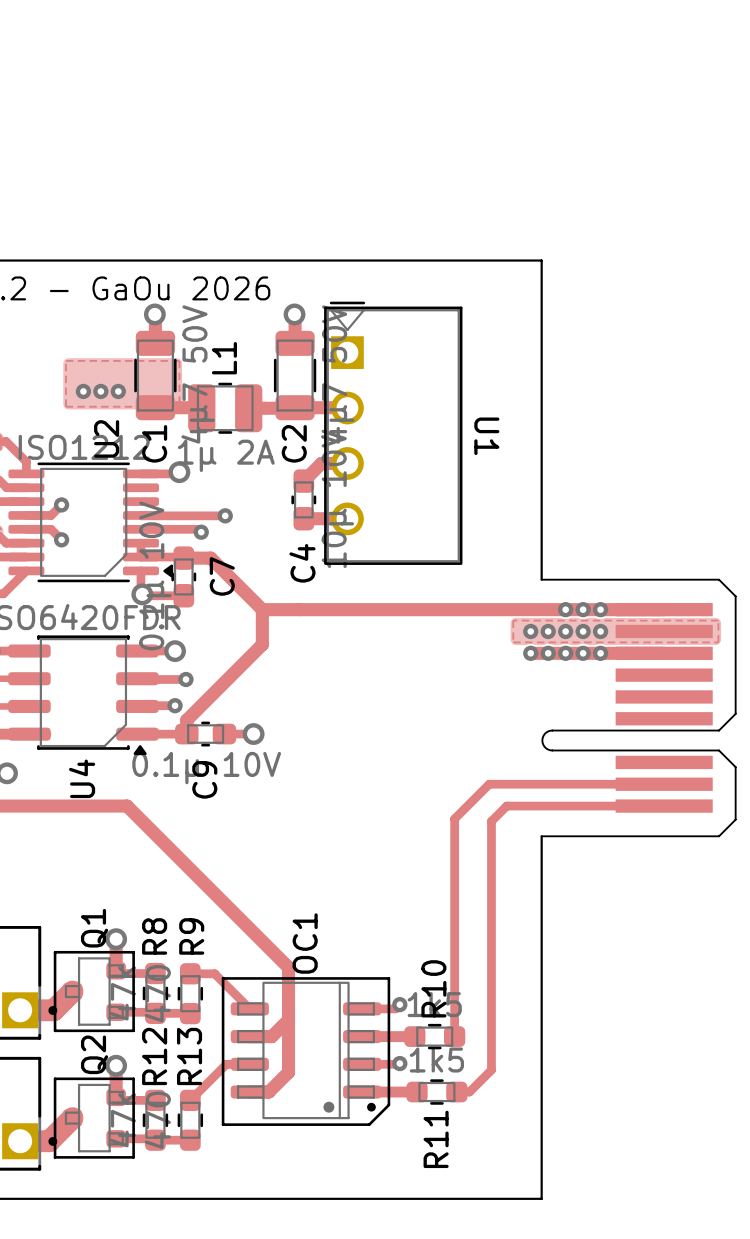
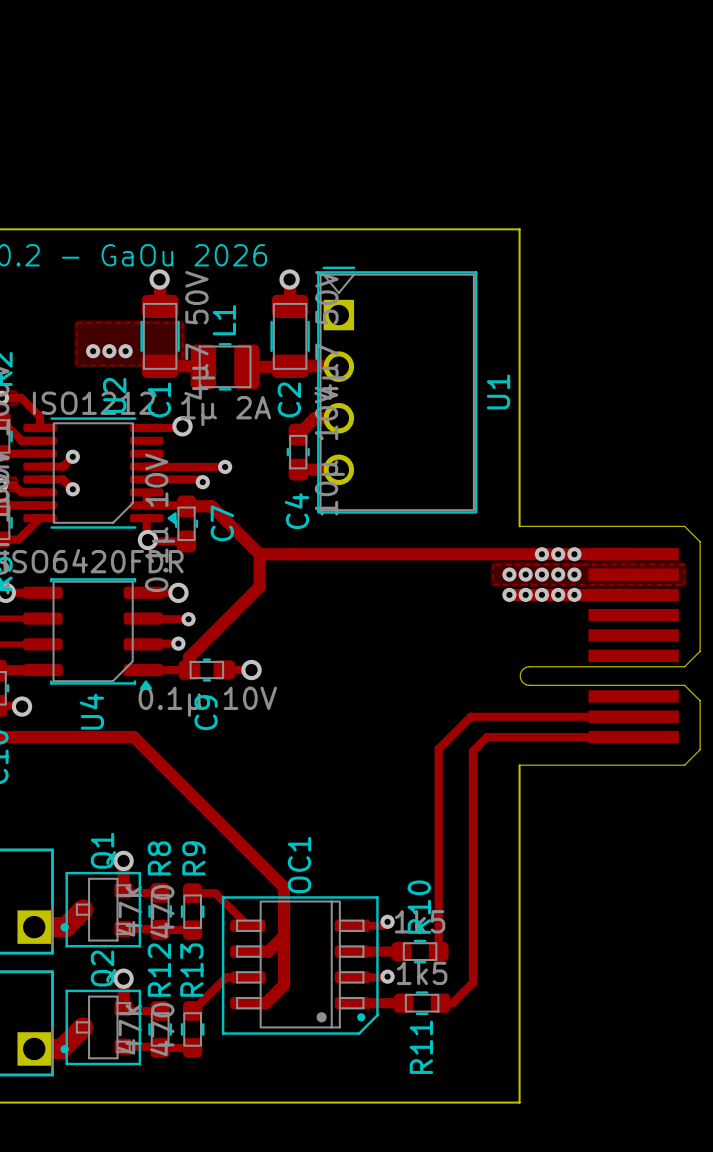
U1 footprint: [324, 301, 463, 565] -> [317, 266, 478, 514]

